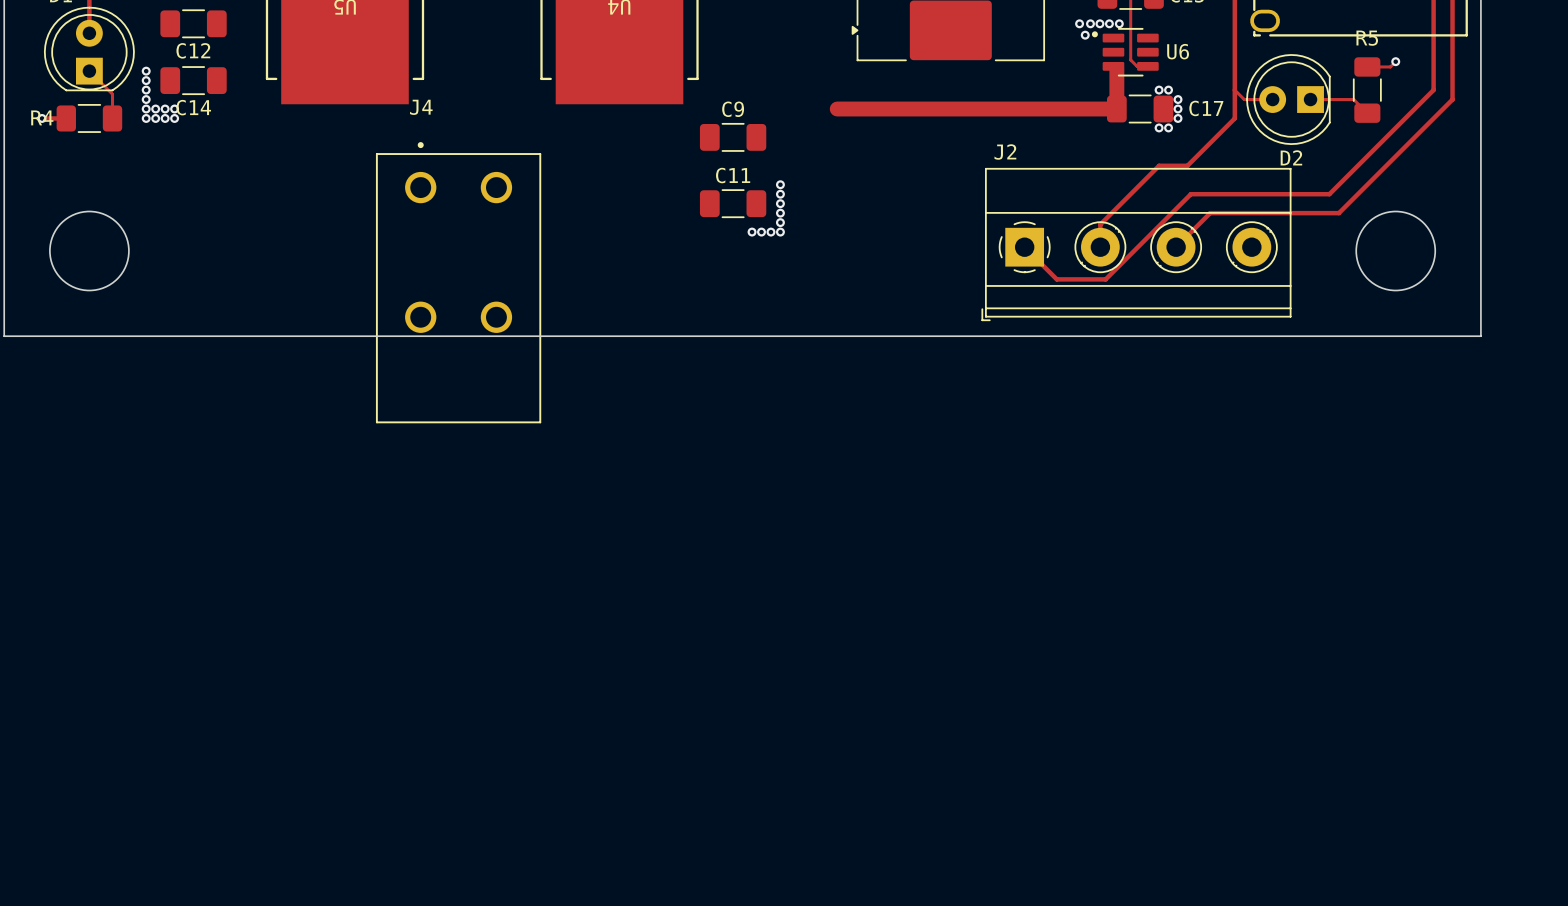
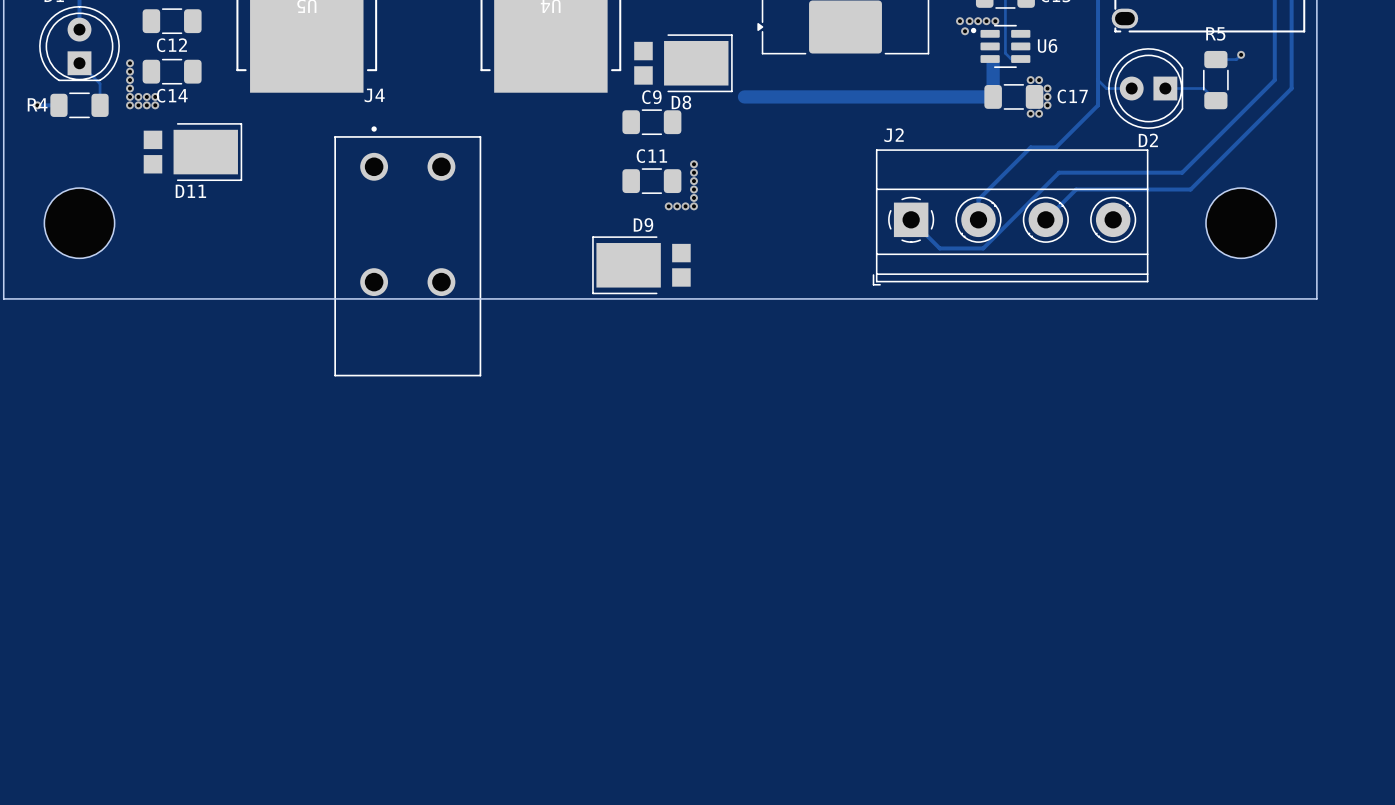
D8: none -> (683, 63)
D11: none -> (192, 152)
D9: none -> (641, 265)

